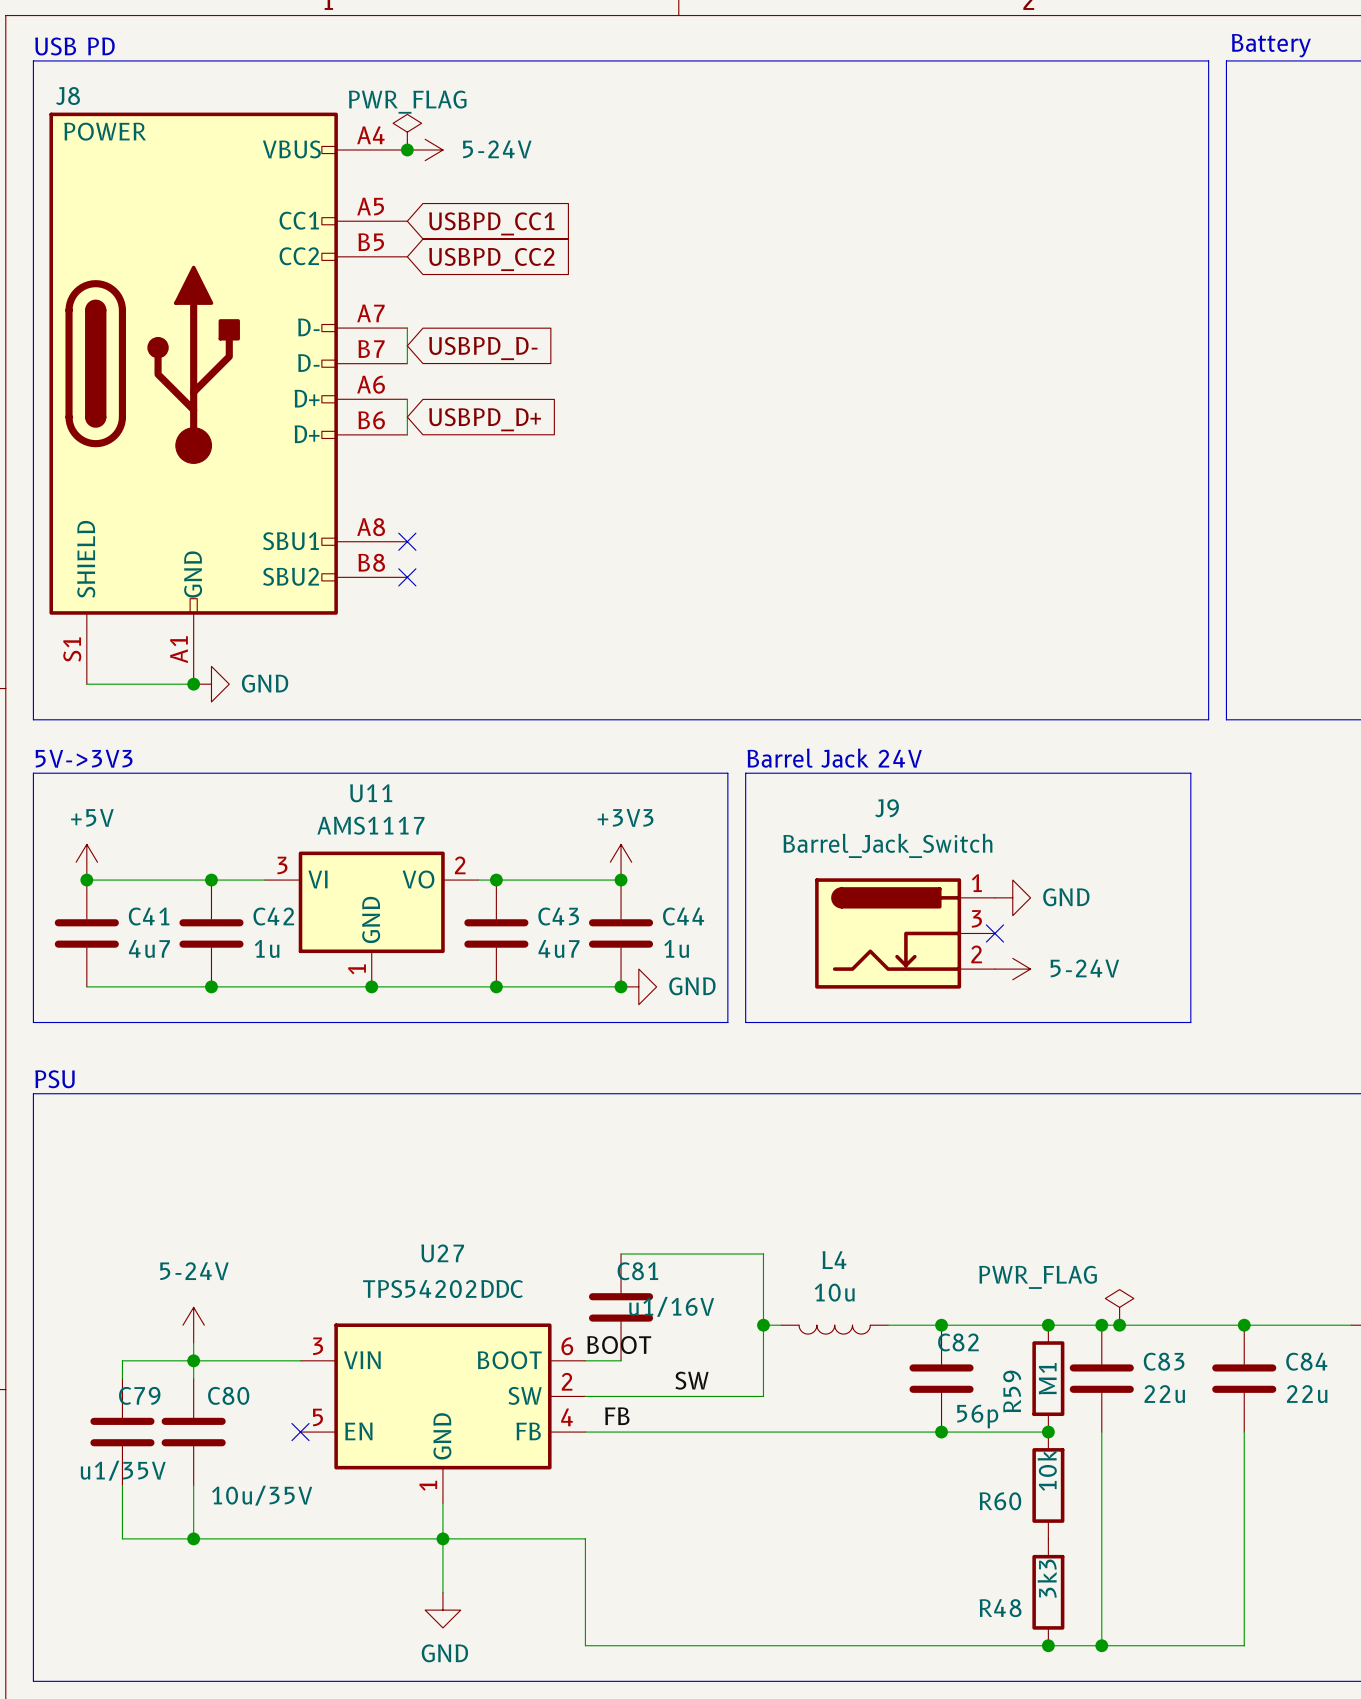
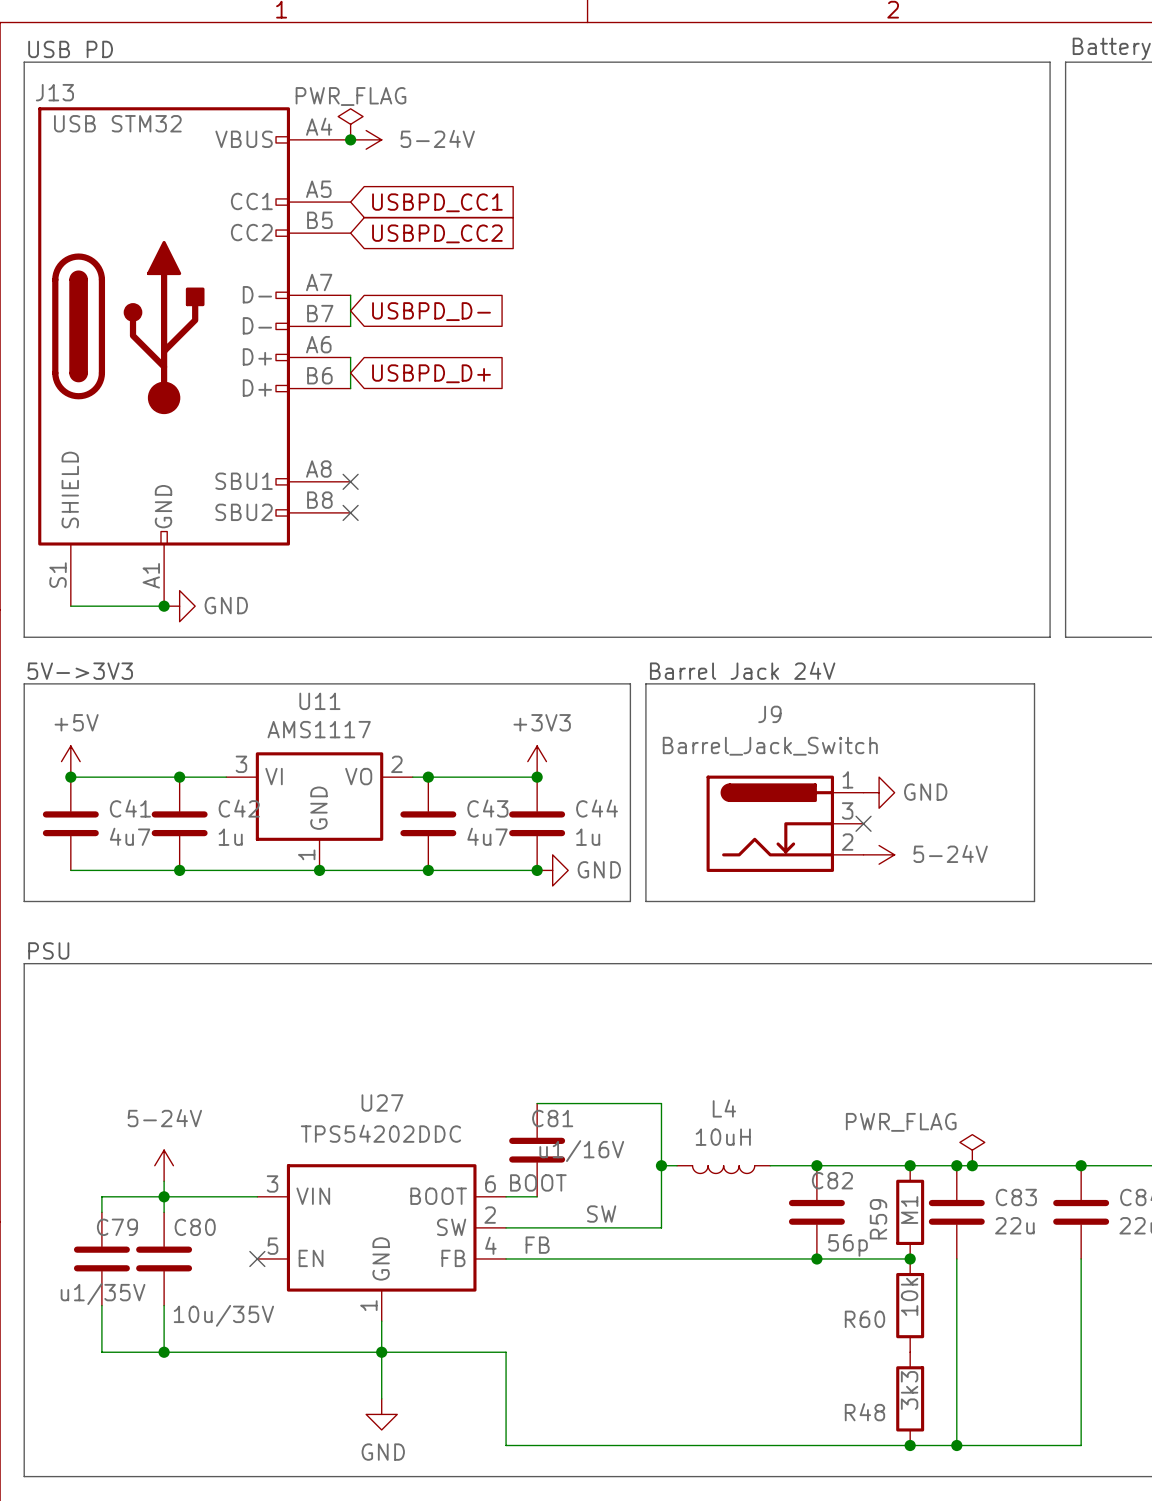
J8 name: J8 (68, 96) -> J13 (54, 92)
J8 value: POWER (105, 131) -> USB STM32 (117, 123)
L4 value: 10u (834, 1292) -> 10uH (723, 1137)

